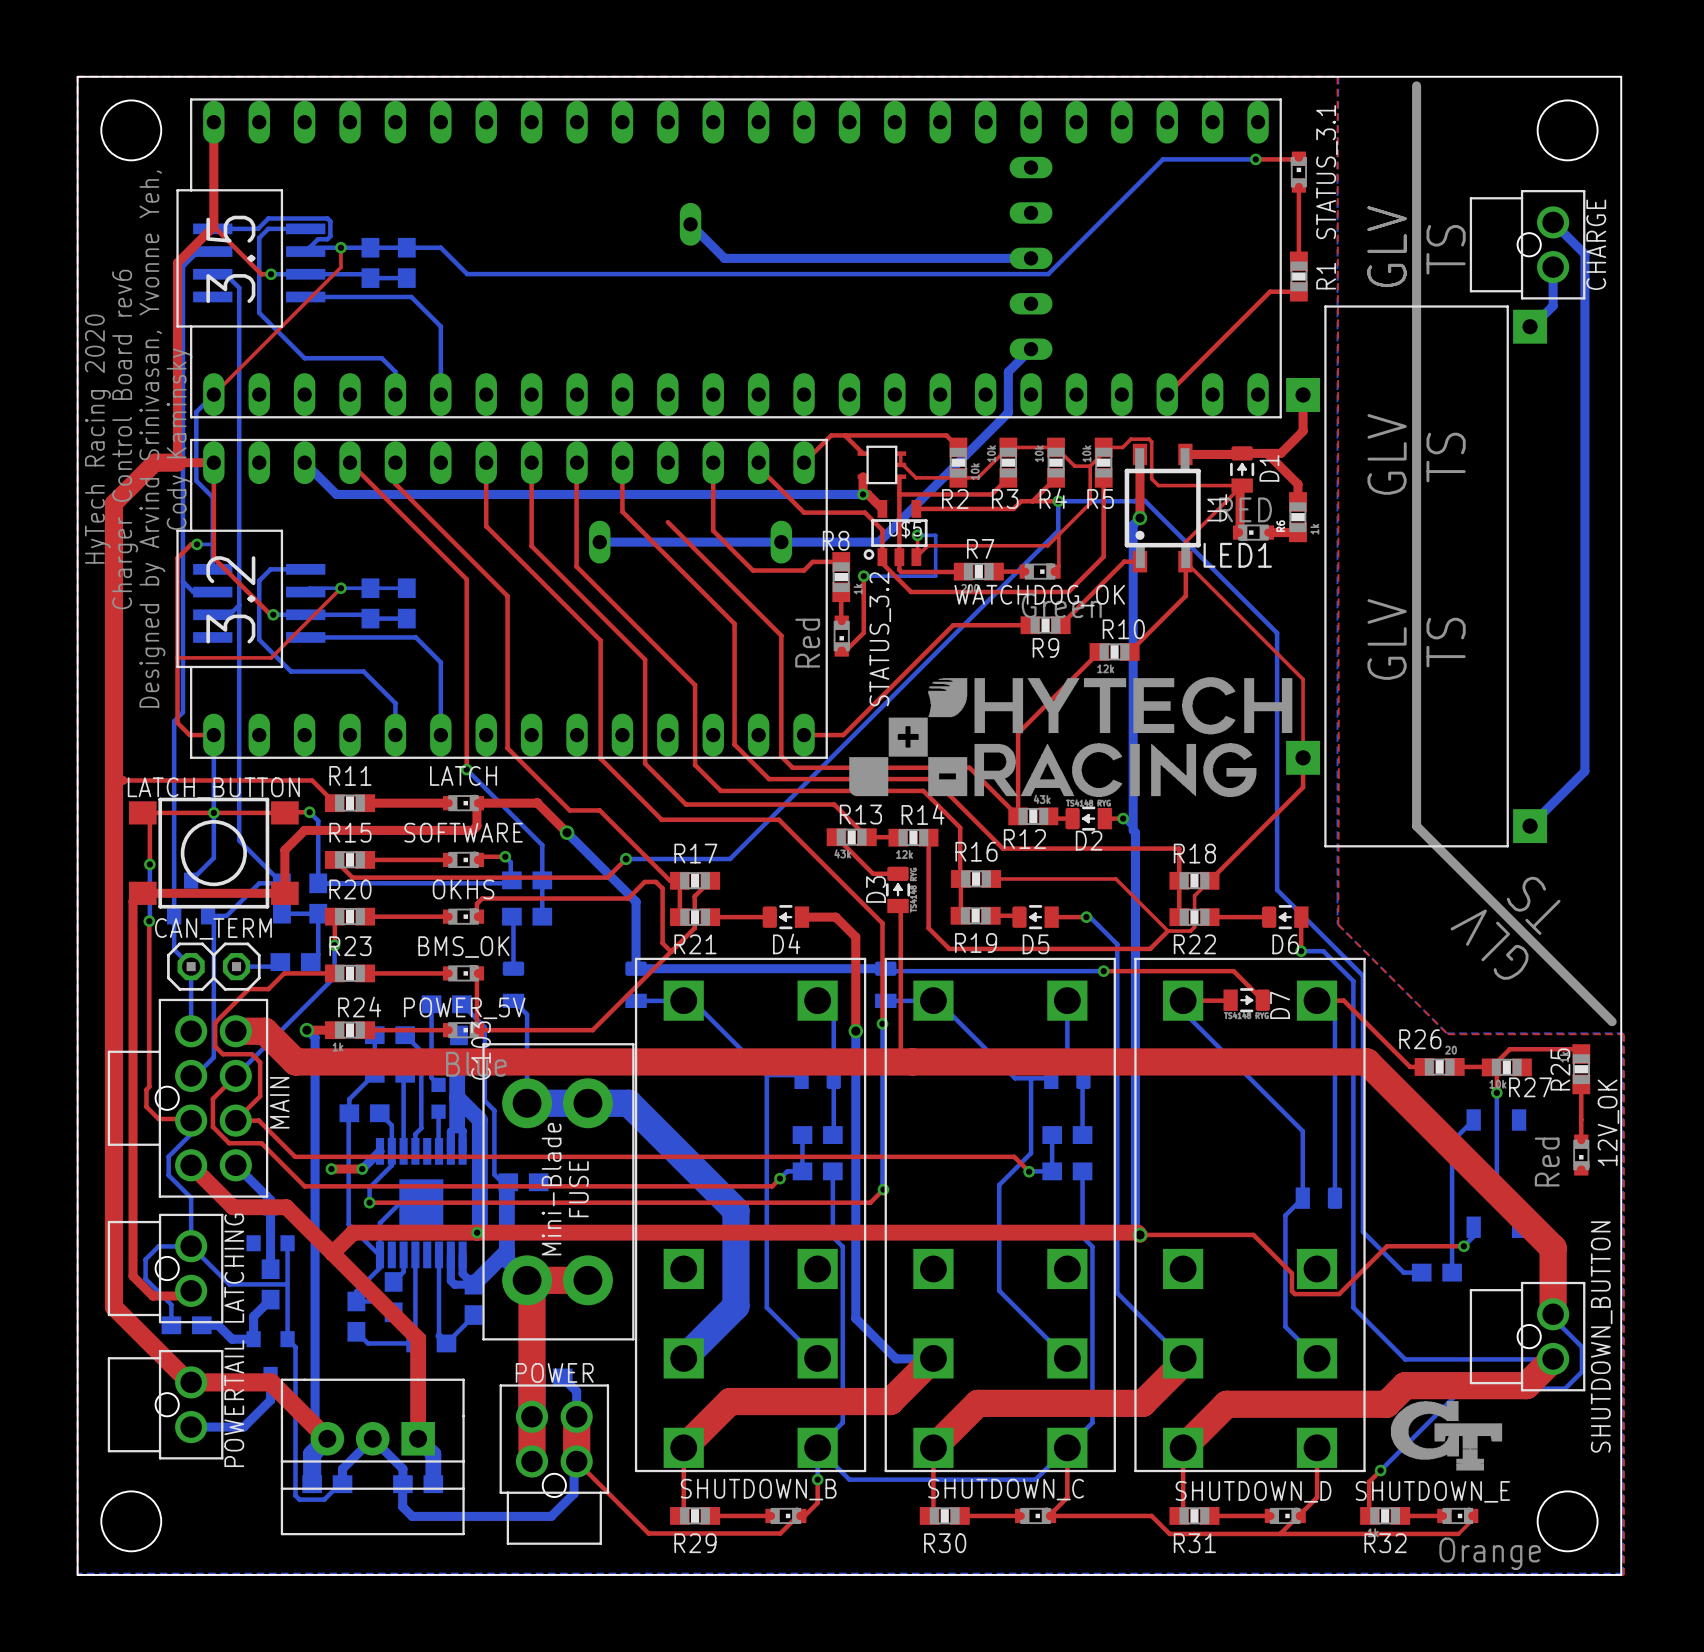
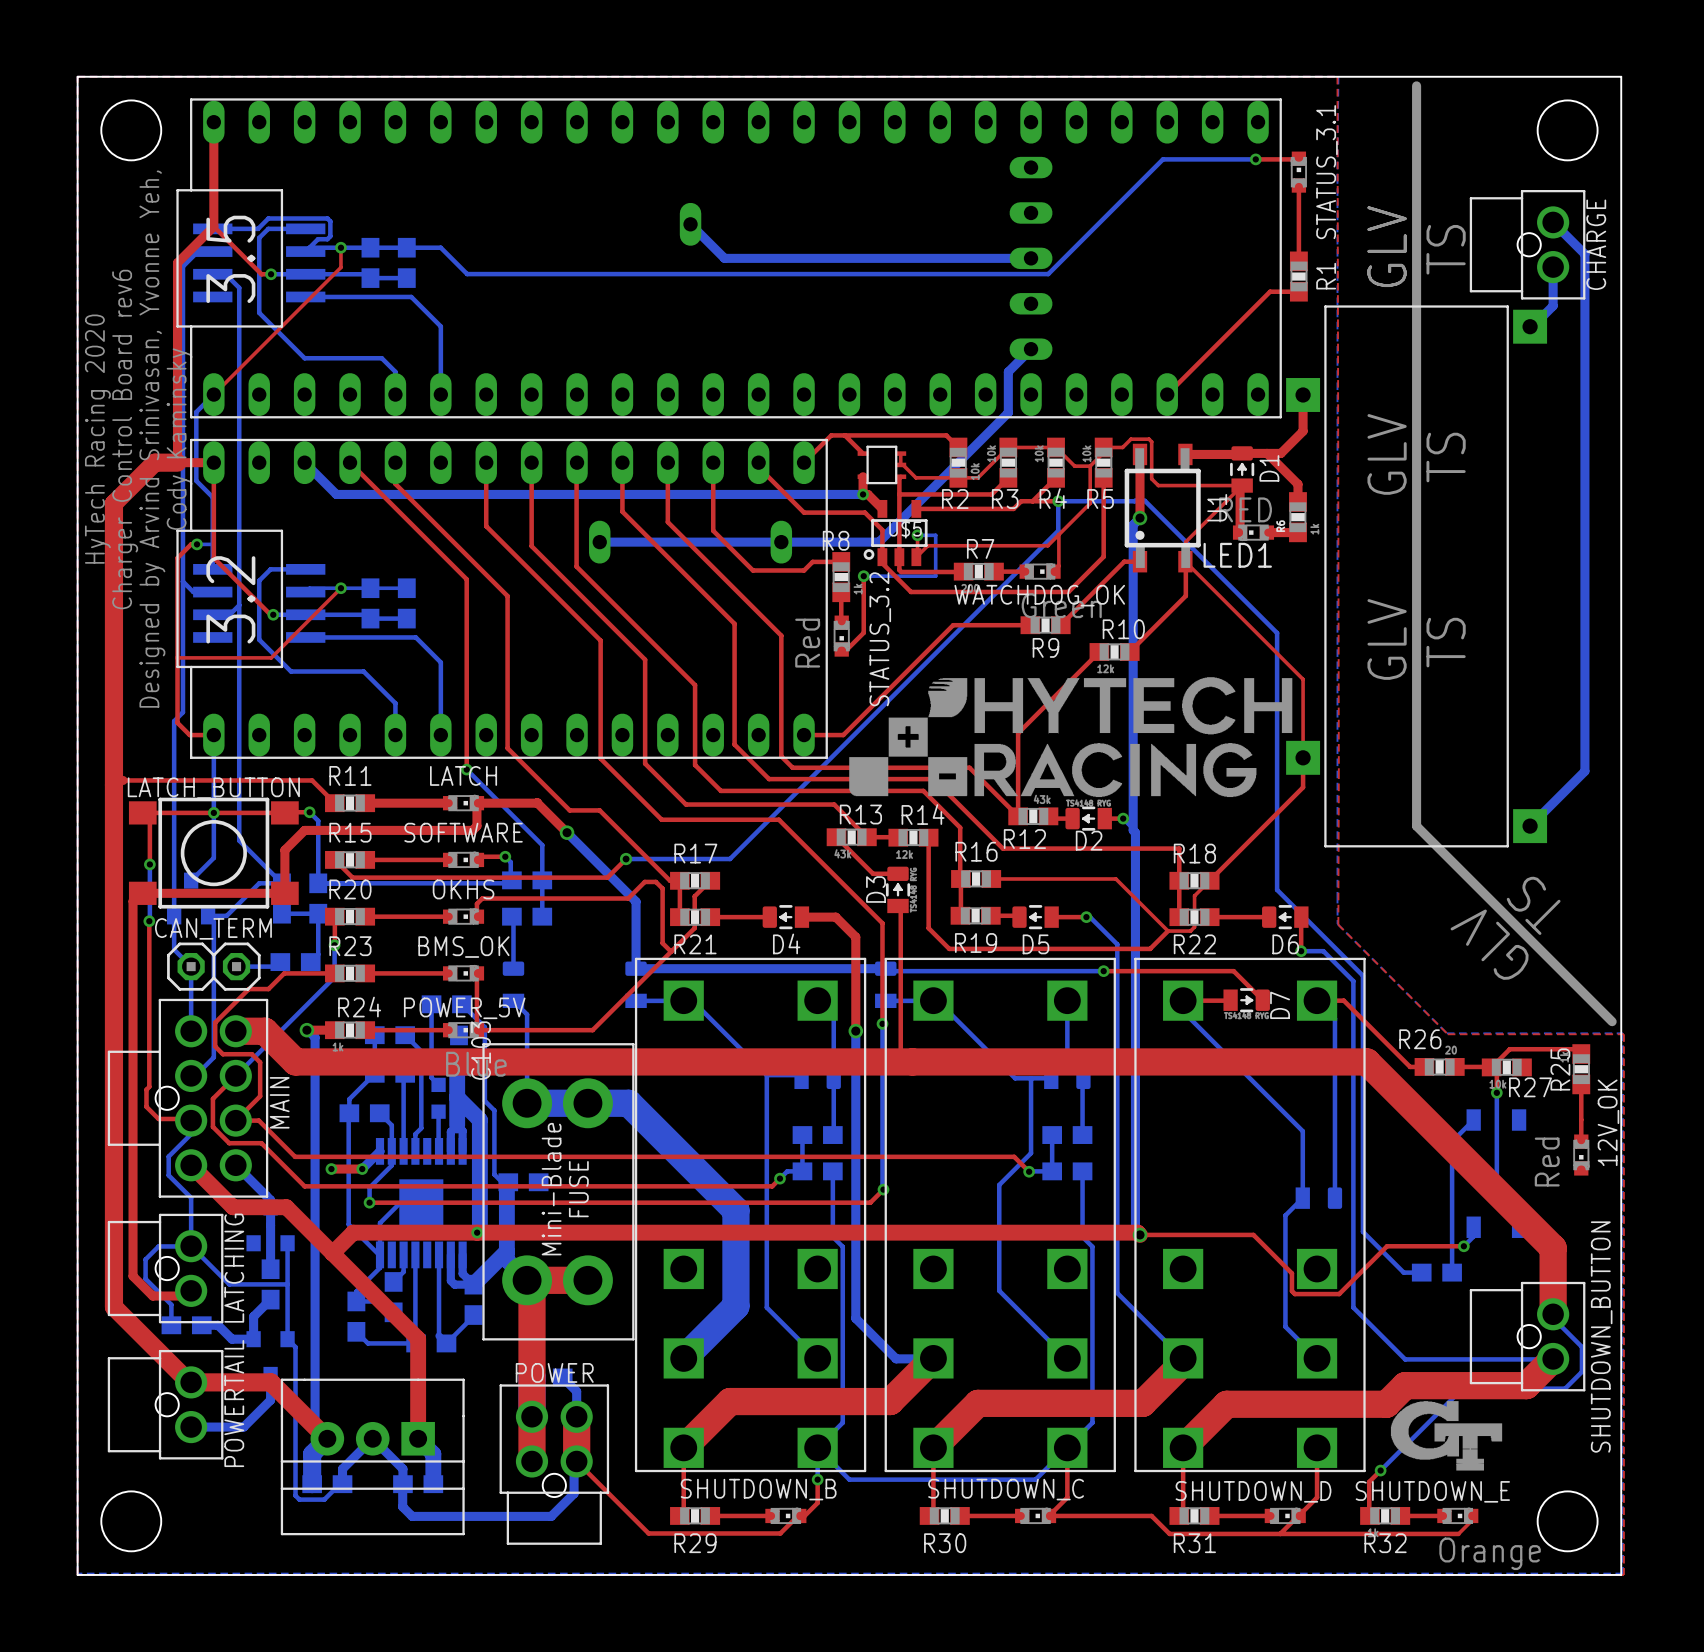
top track: none -> (667, 462) (667, 522)

